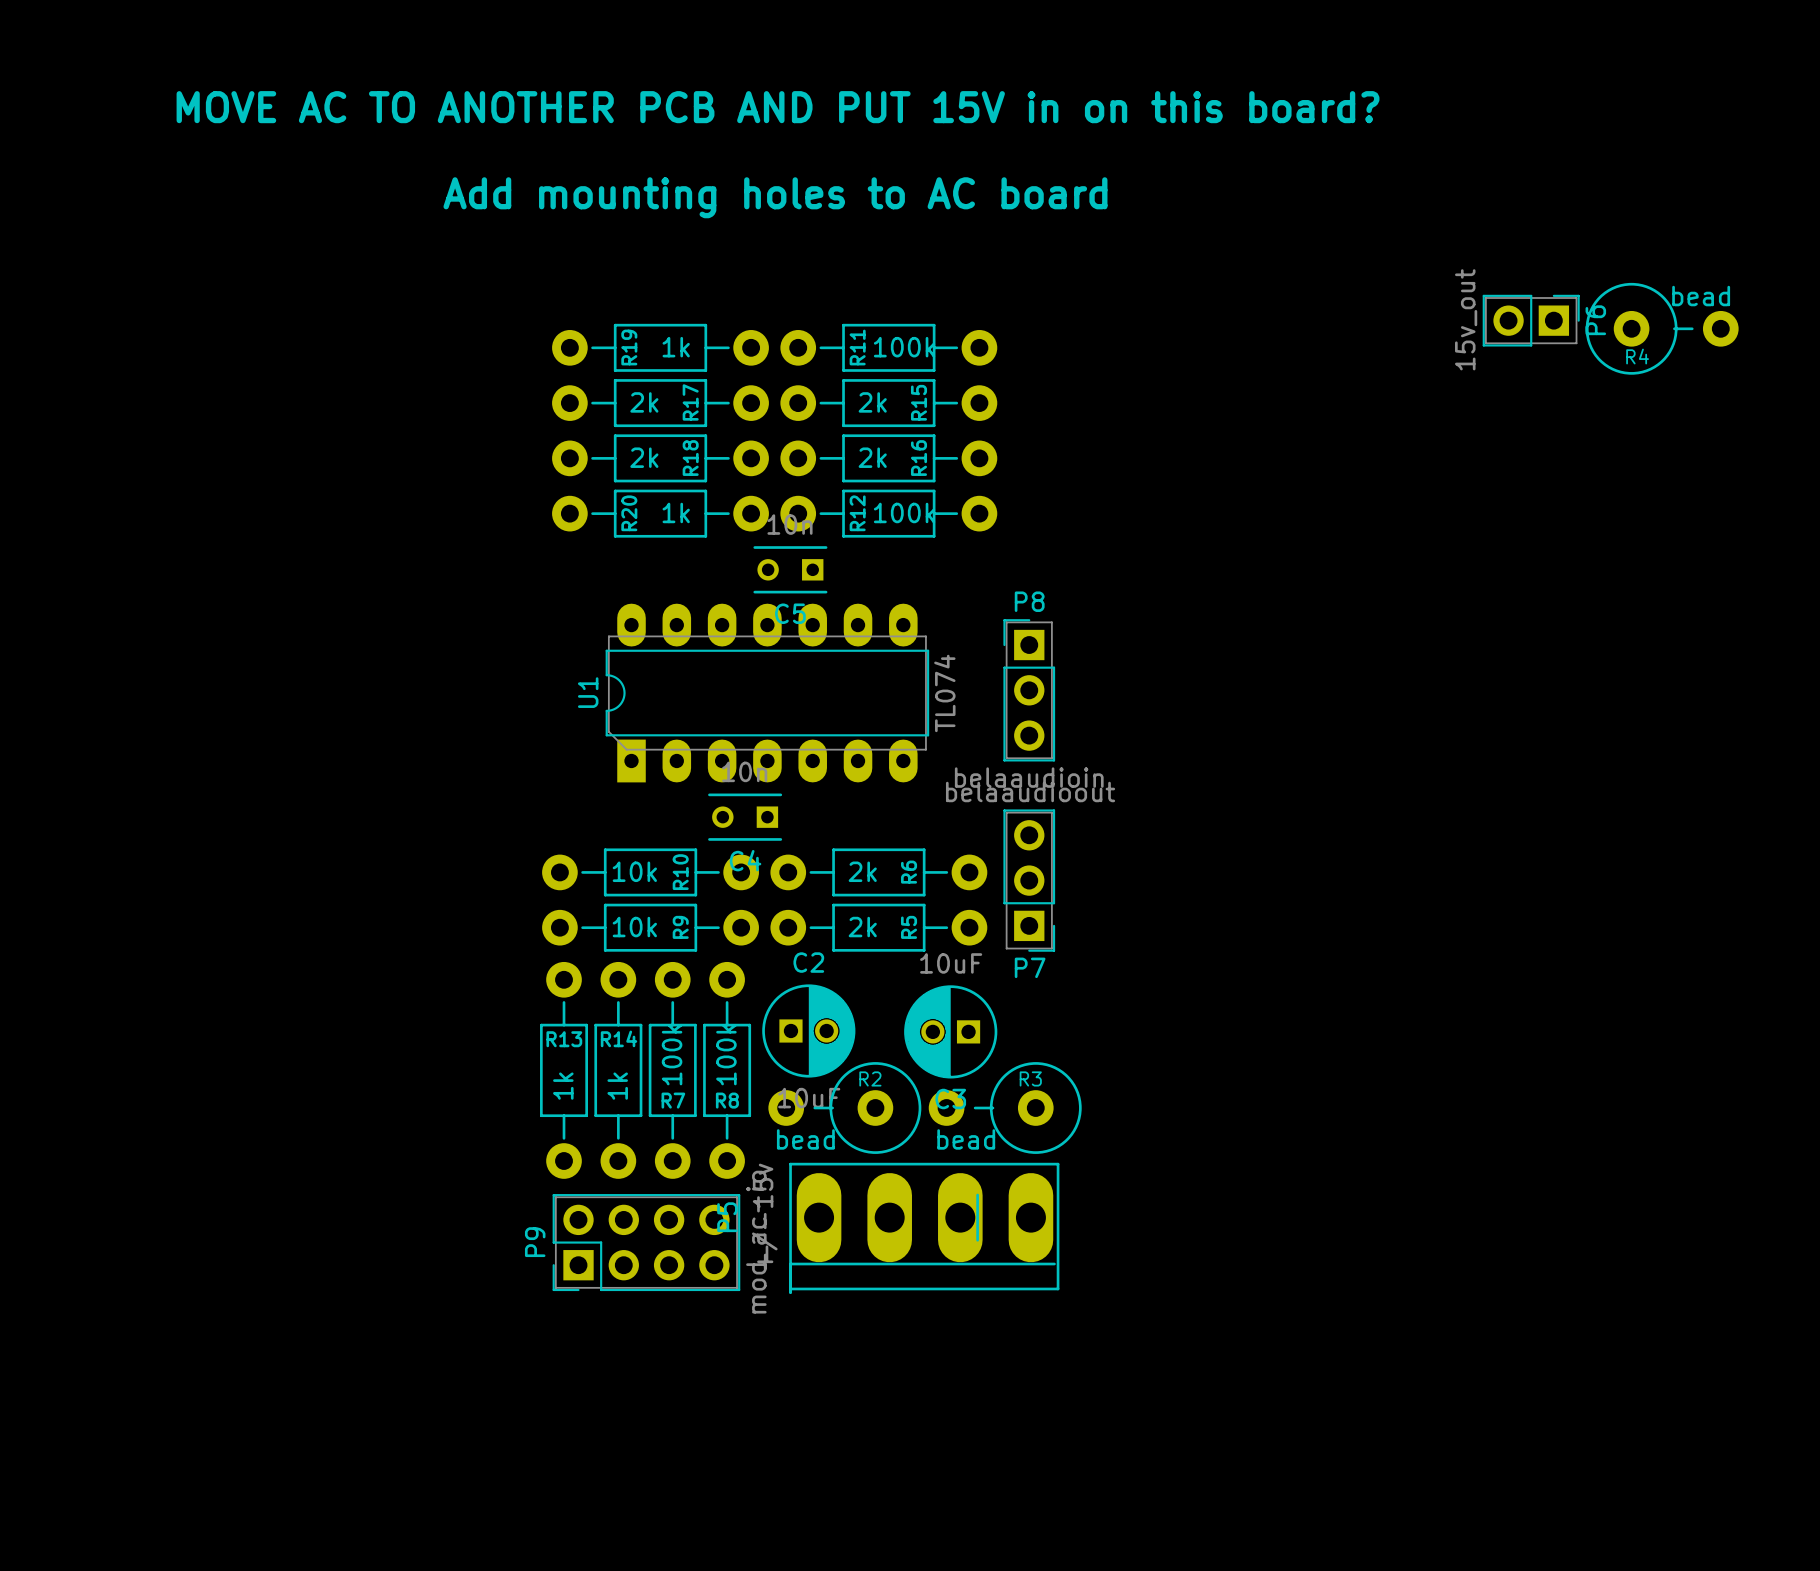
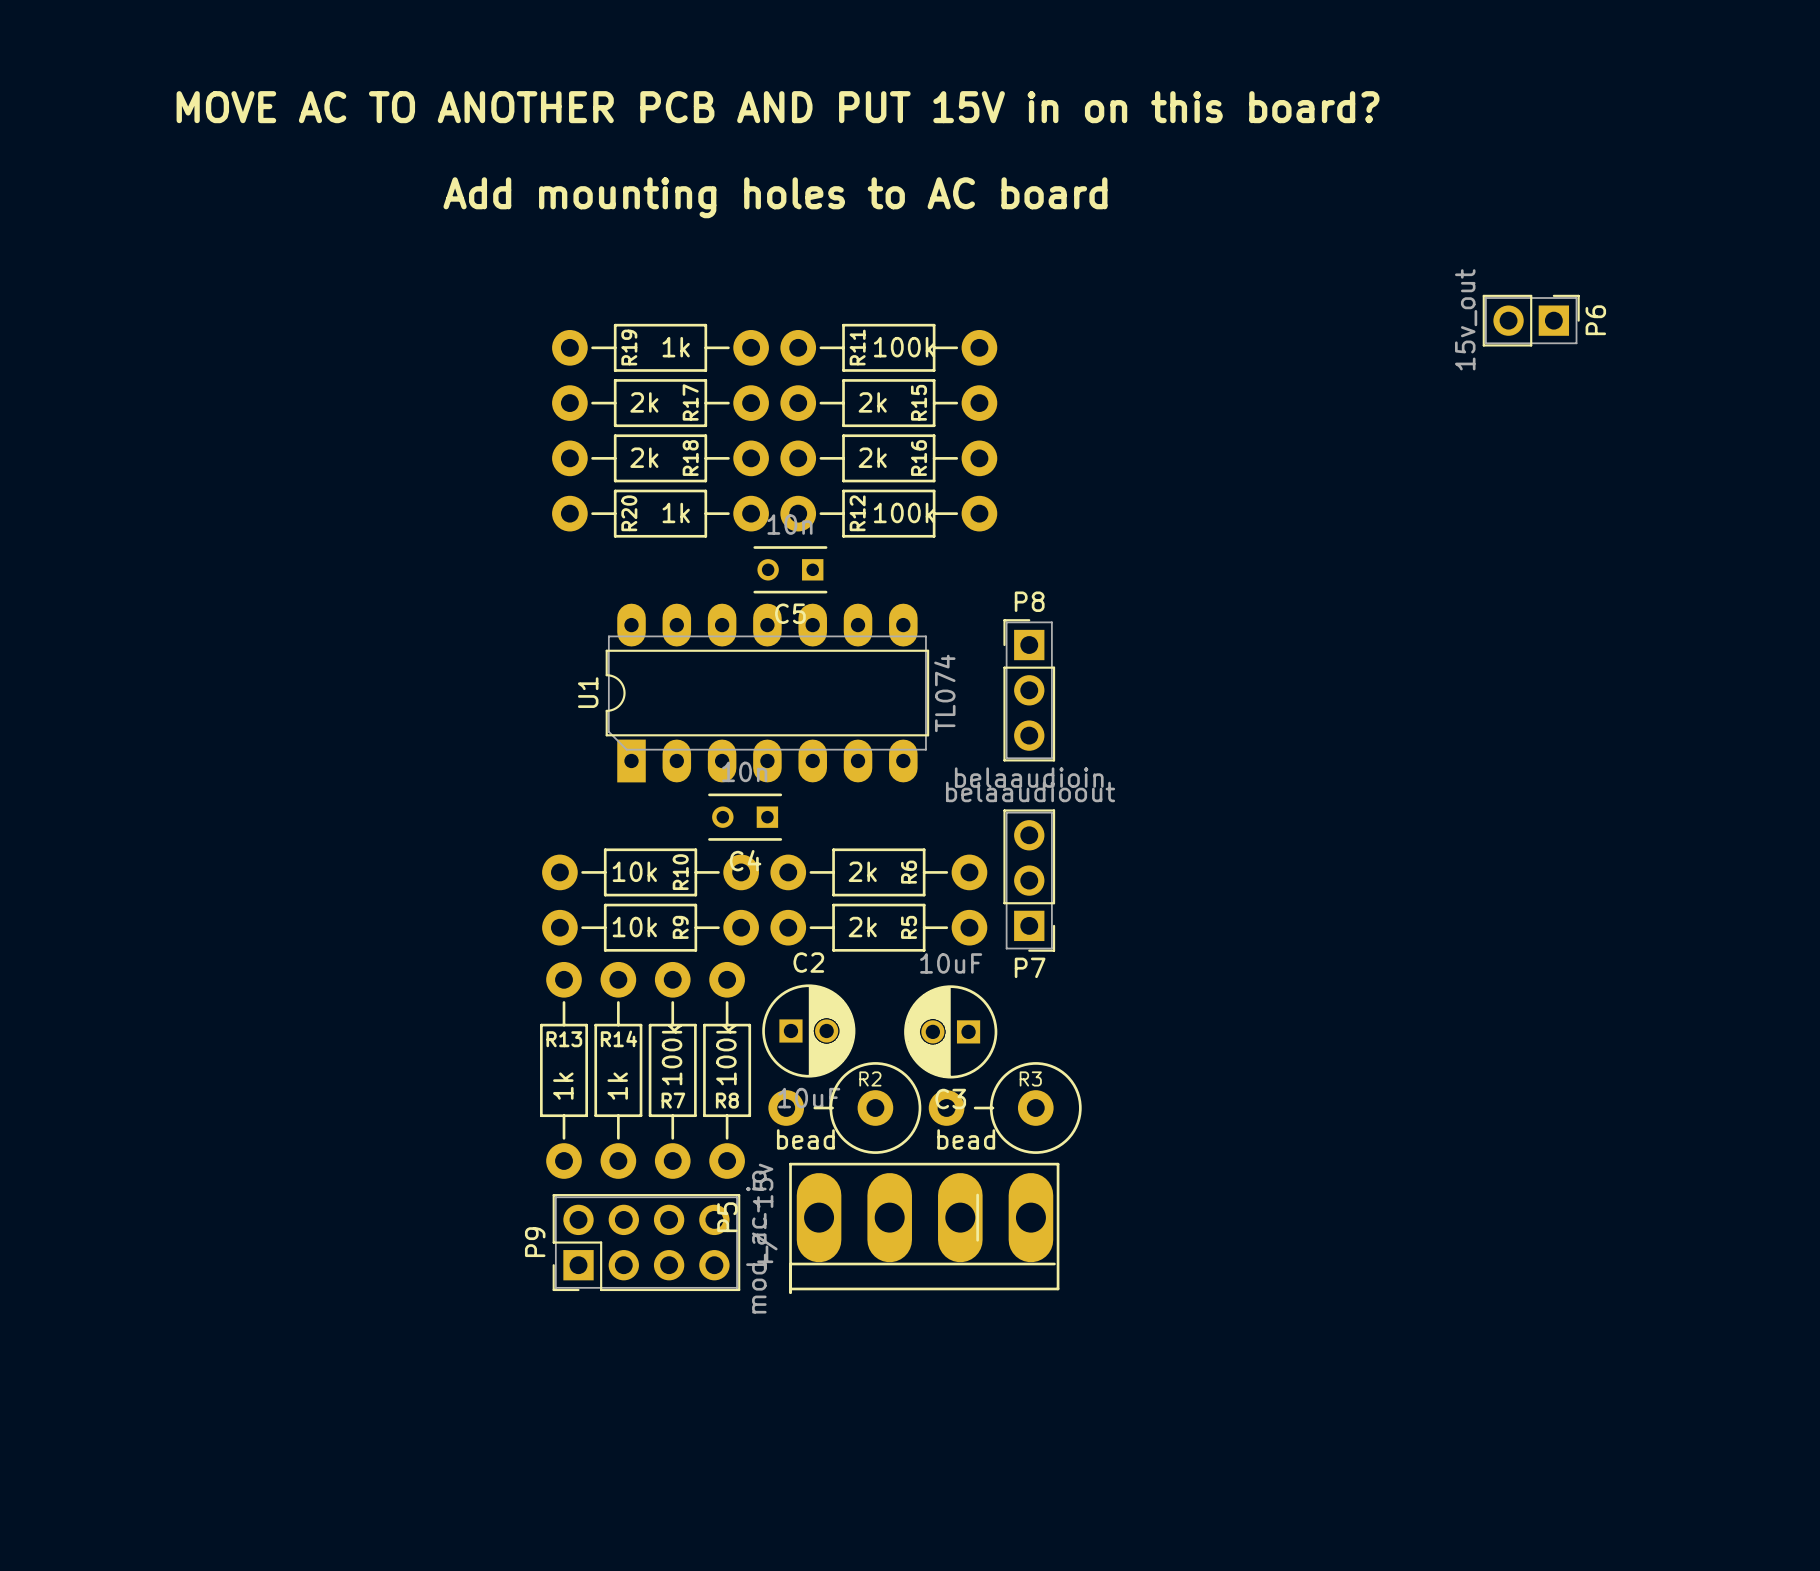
R4: bead (1662, 328) -> none

